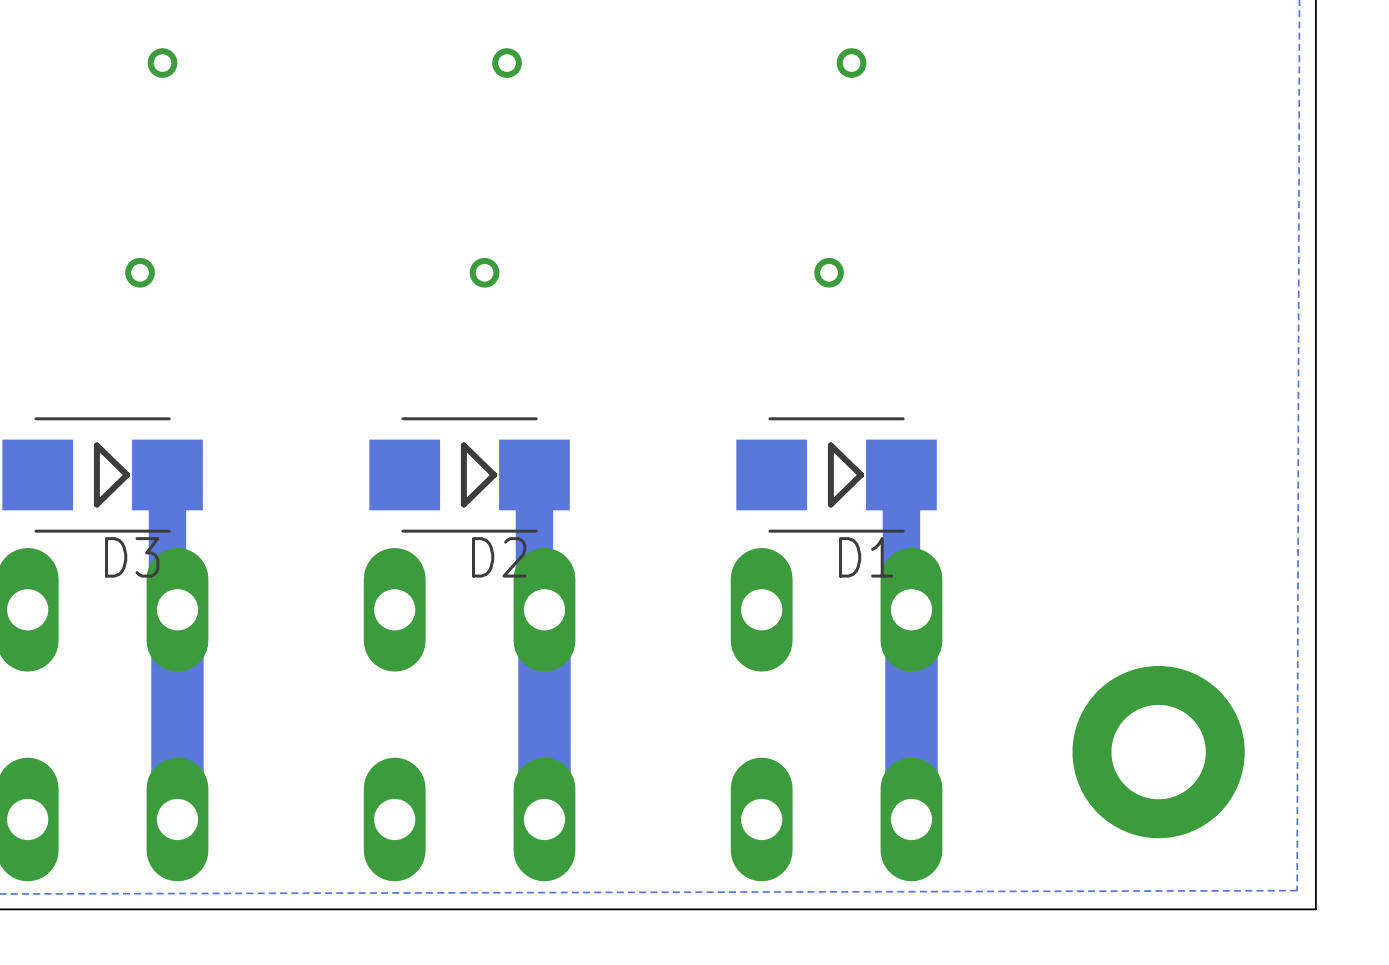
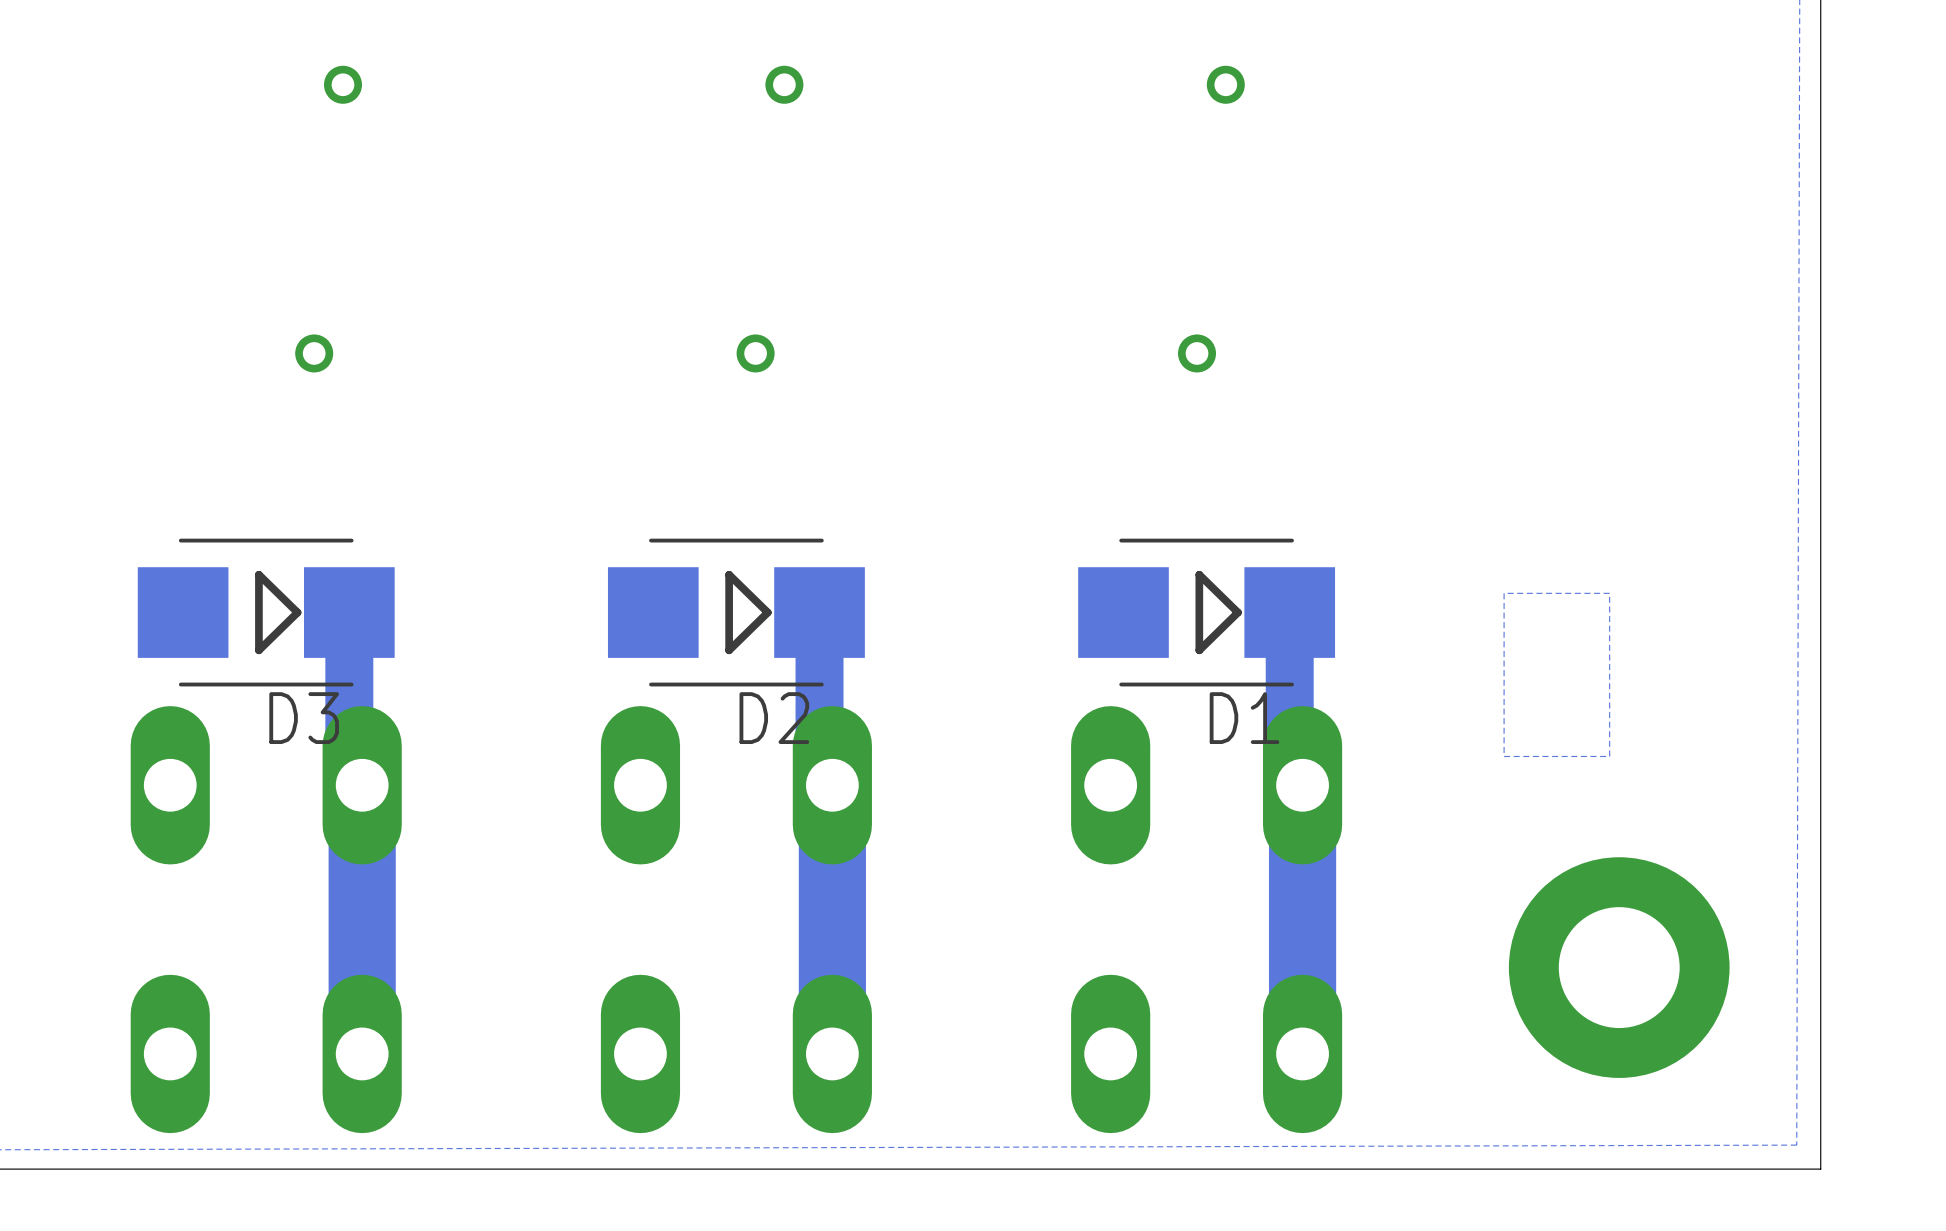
zone outline: none -> (1609, 593) (1504, 593) (1504, 756) (1609, 756) (1609, 593)

